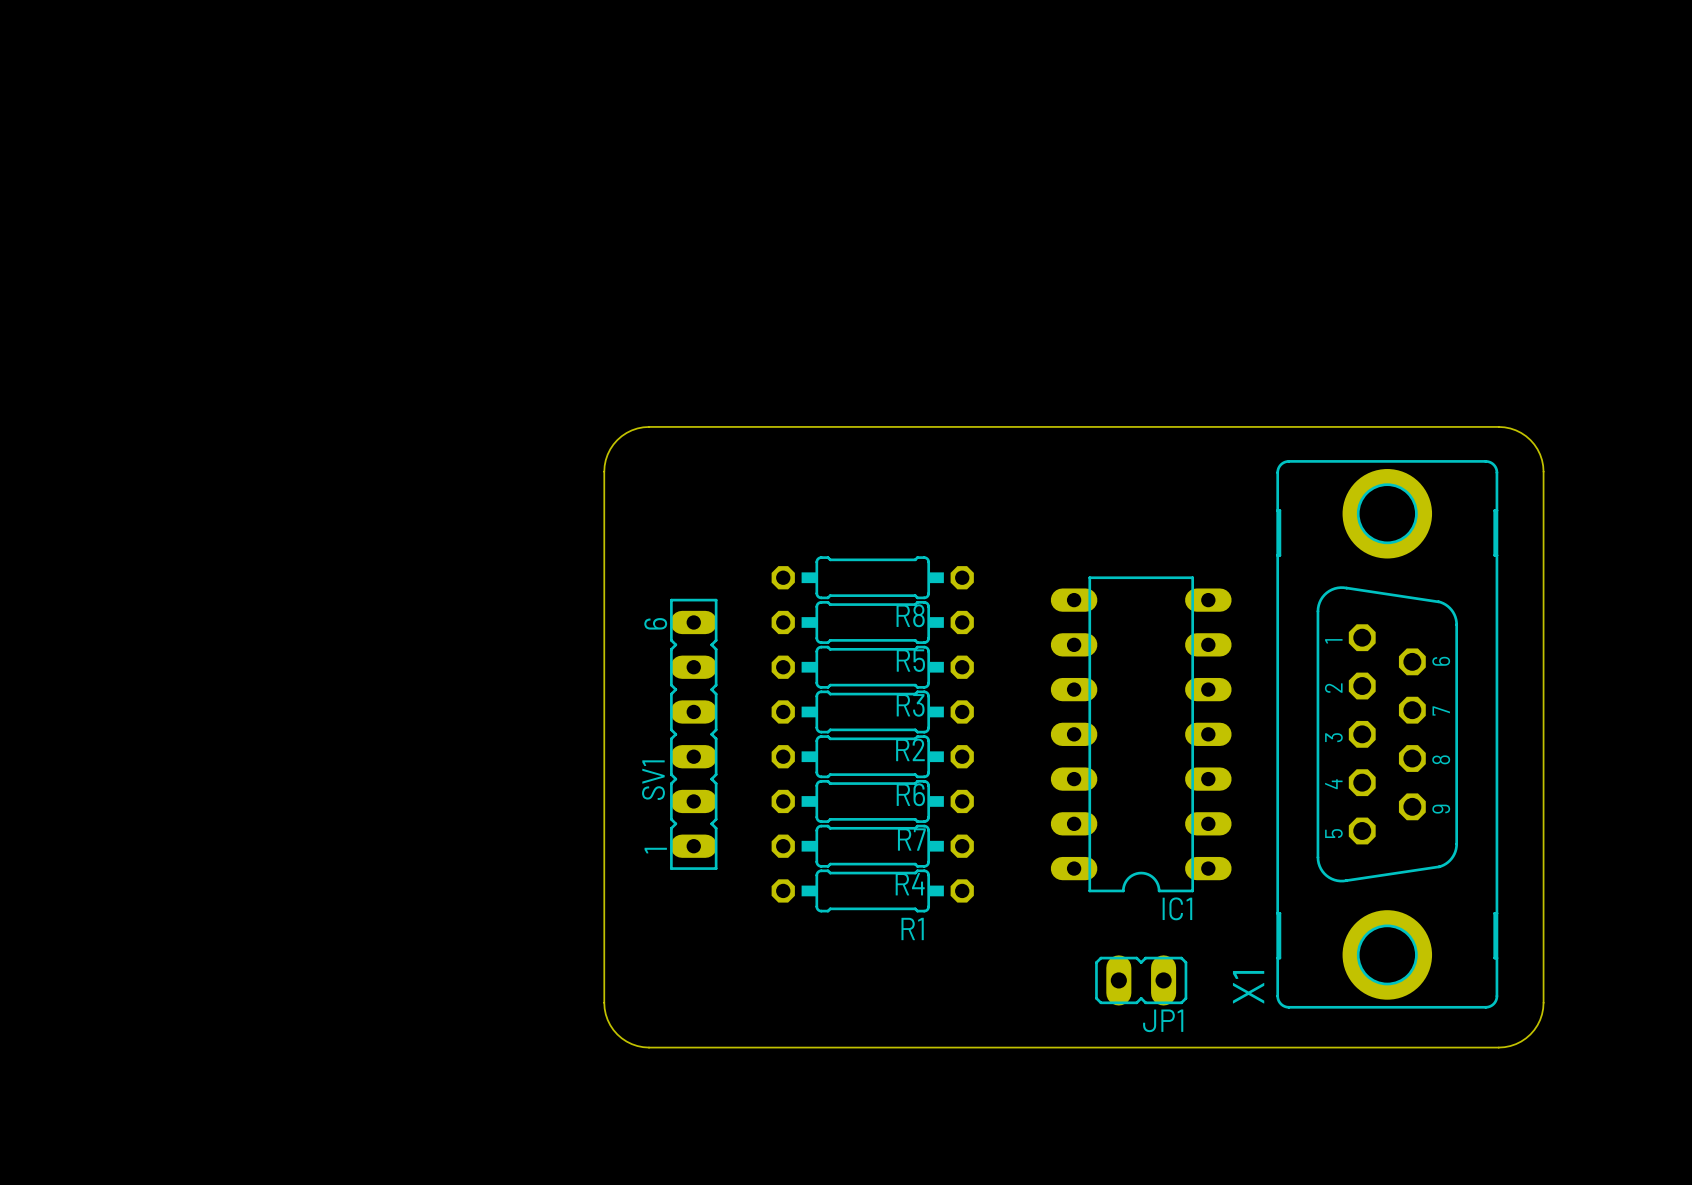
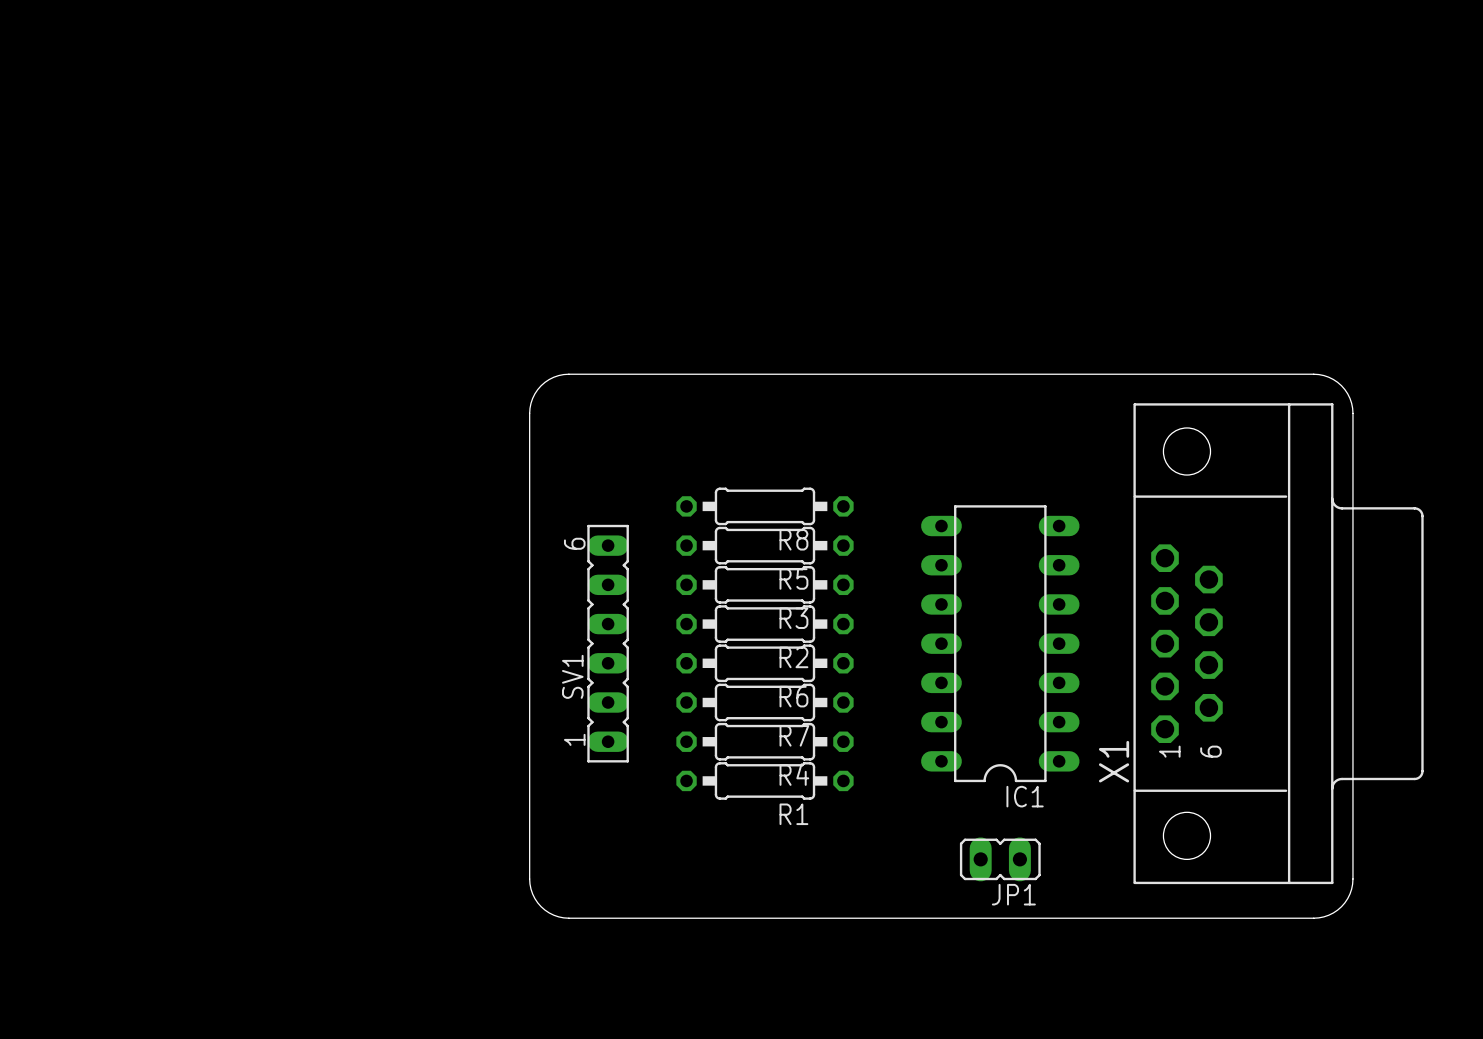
X1 footprint: [1276, 460, 1499, 1009] -> [1133, 403, 1424, 885]
X1 name position: X1 (1248, 987) -> X1 (1114, 761)

